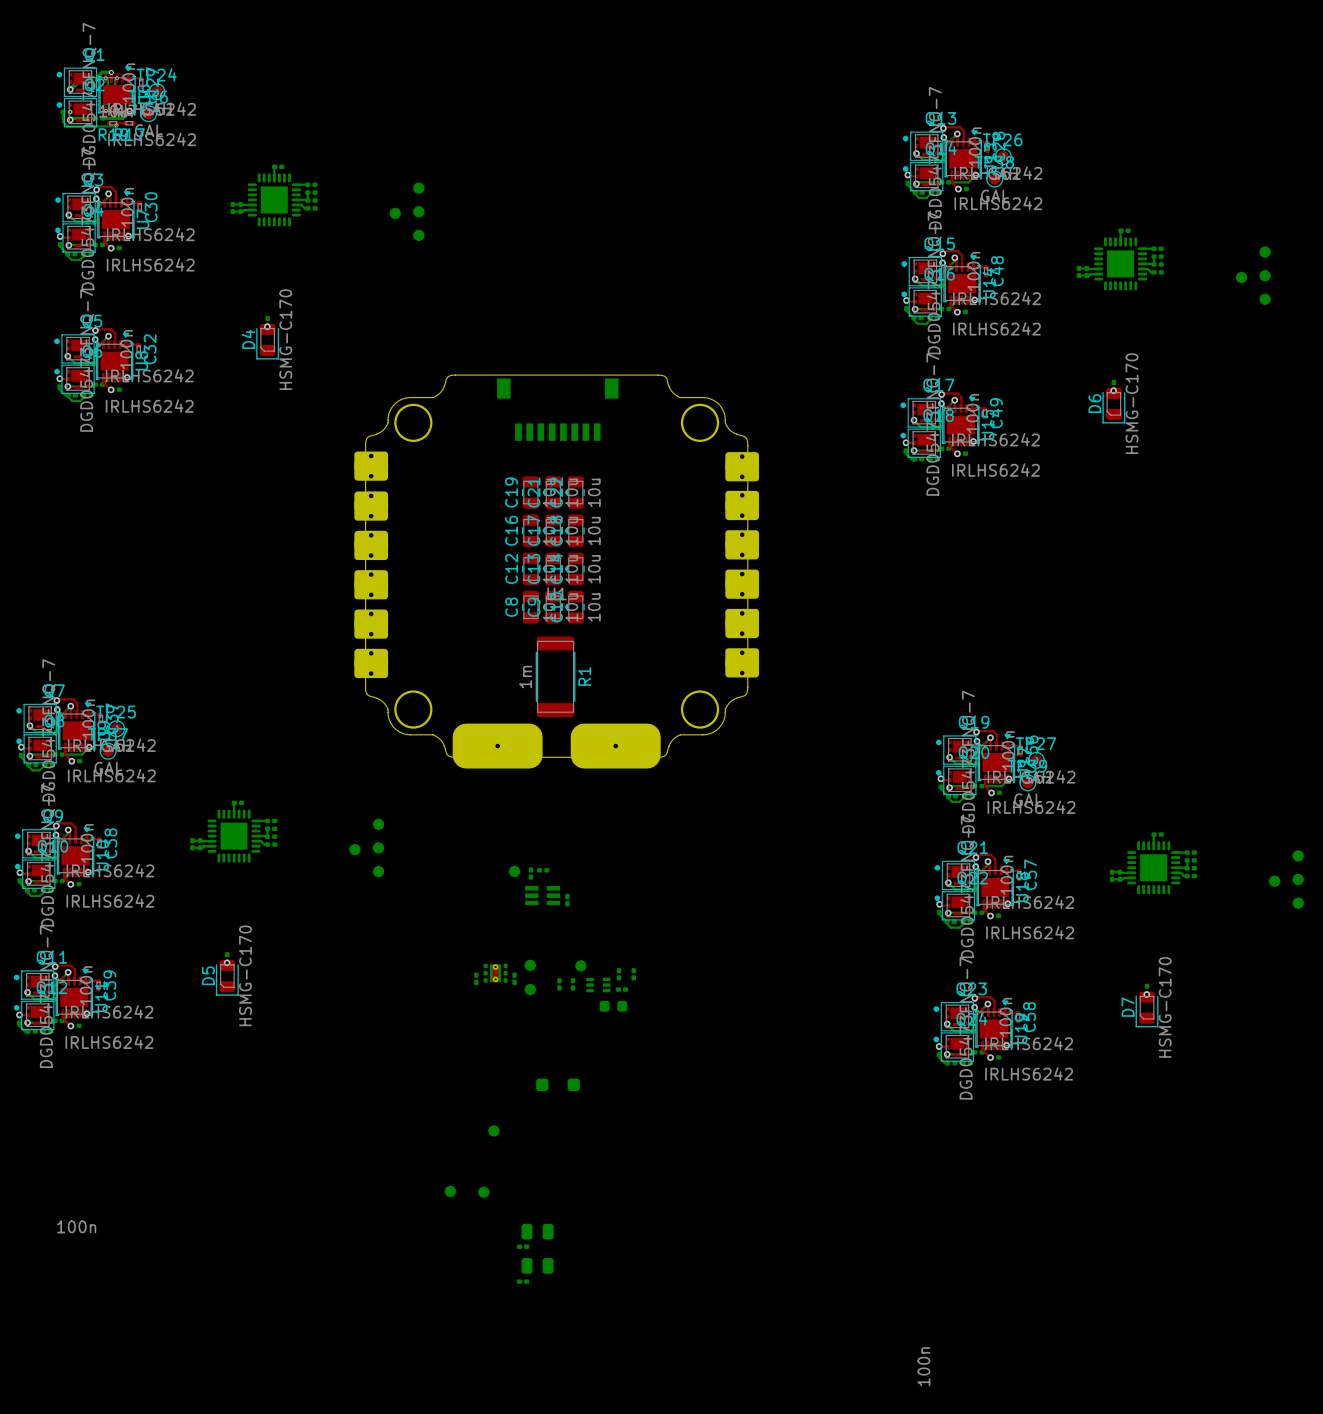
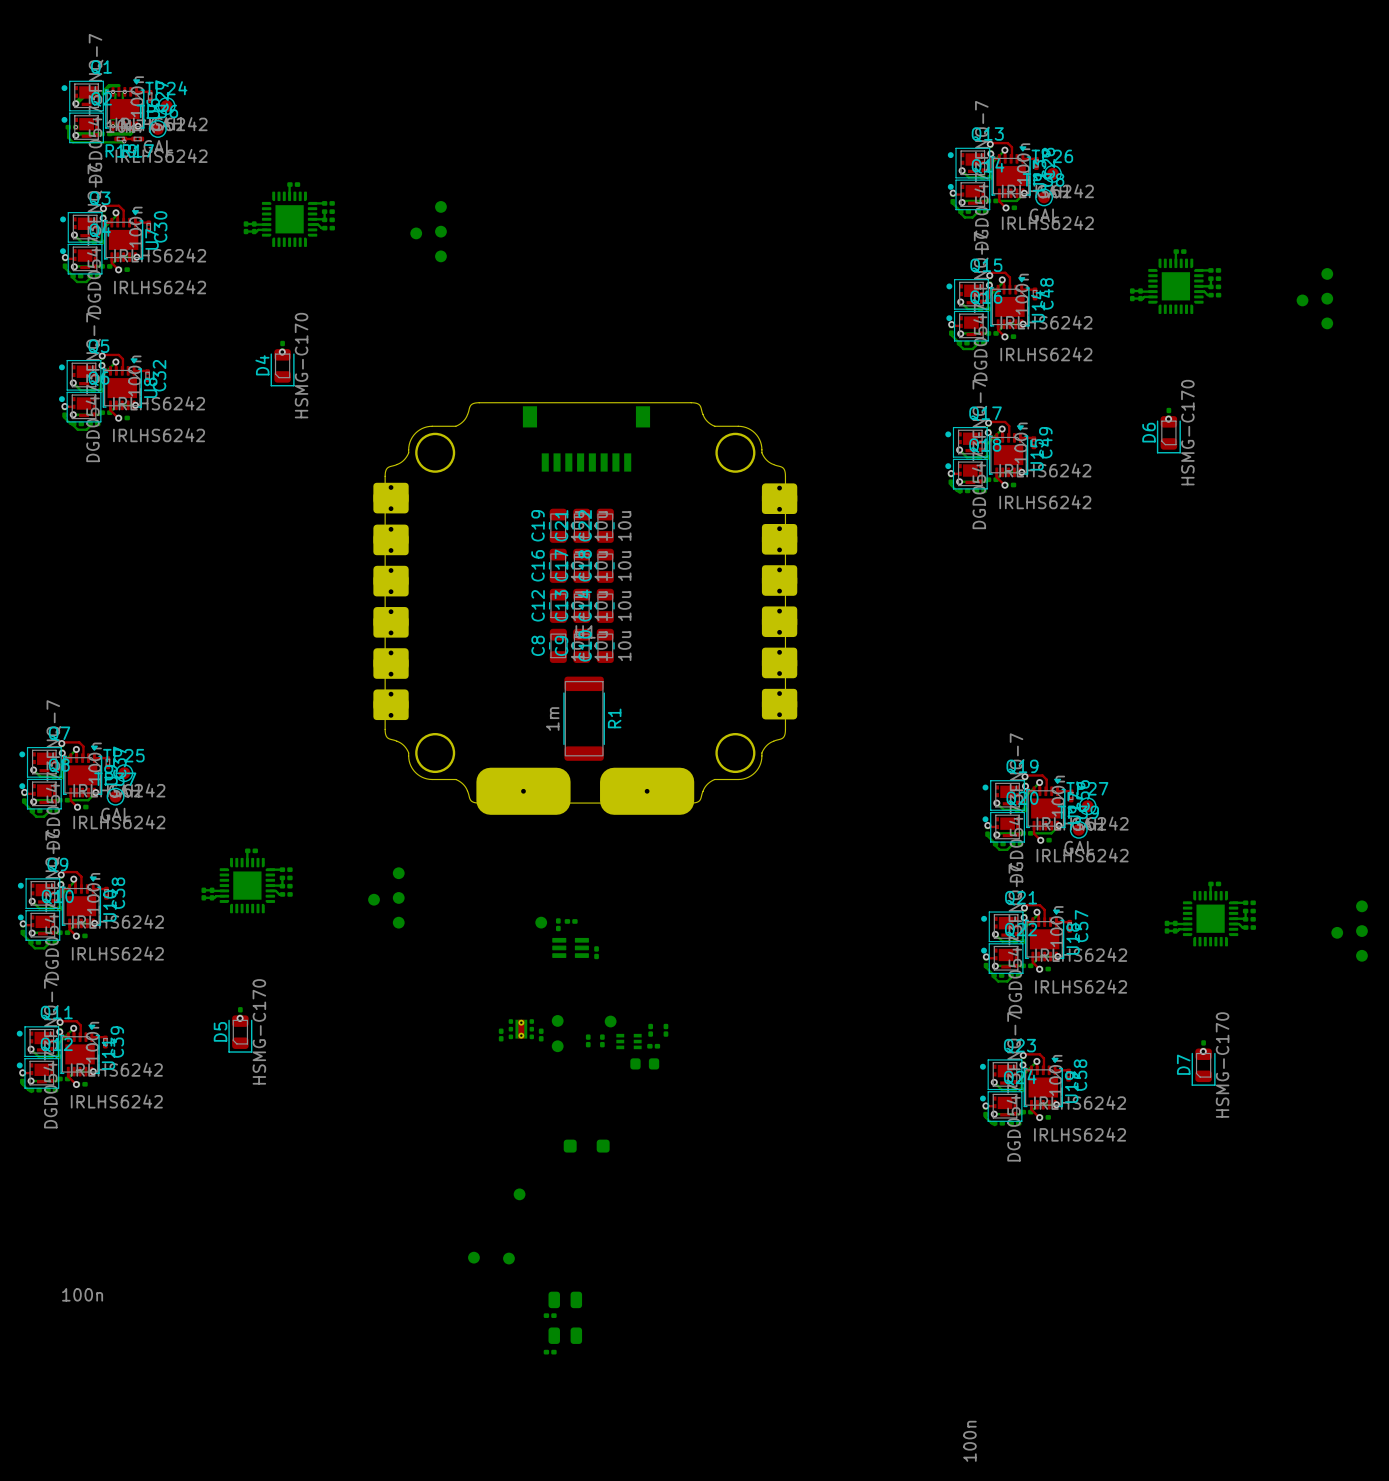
via: (111, 72) -> none

